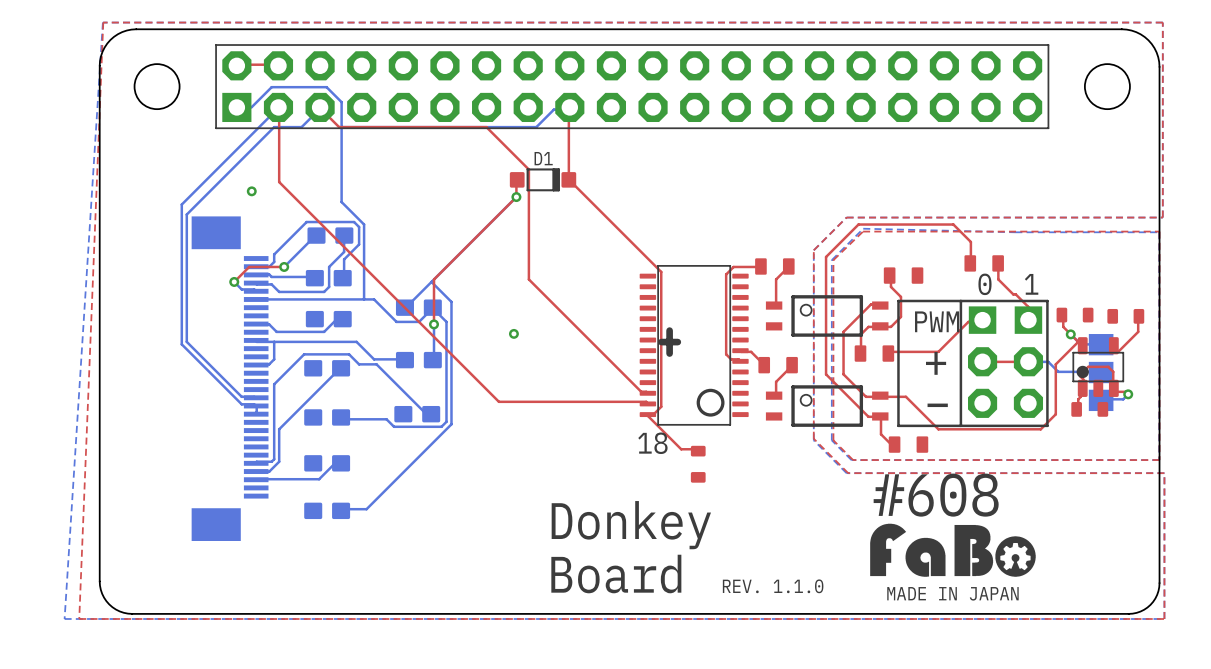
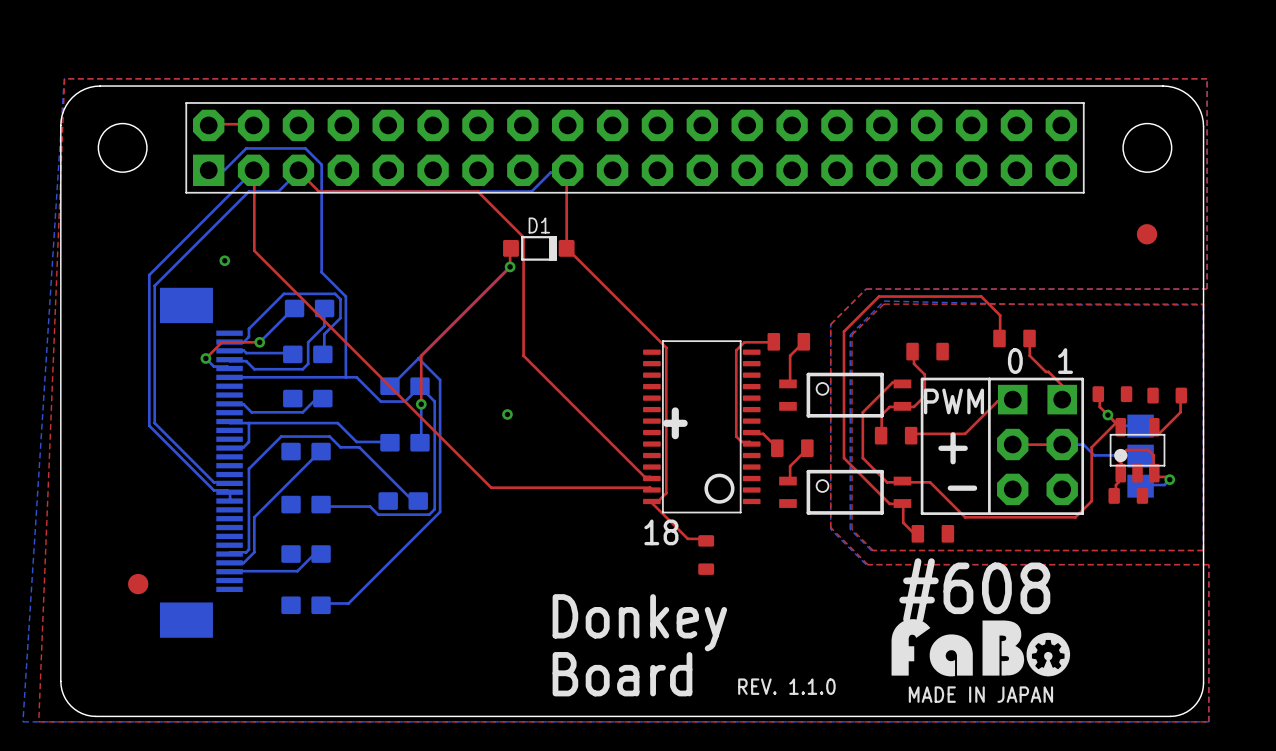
drawing: none -> [1136, 224, 1158, 245]
drawing: none -> [128, 573, 149, 595]

